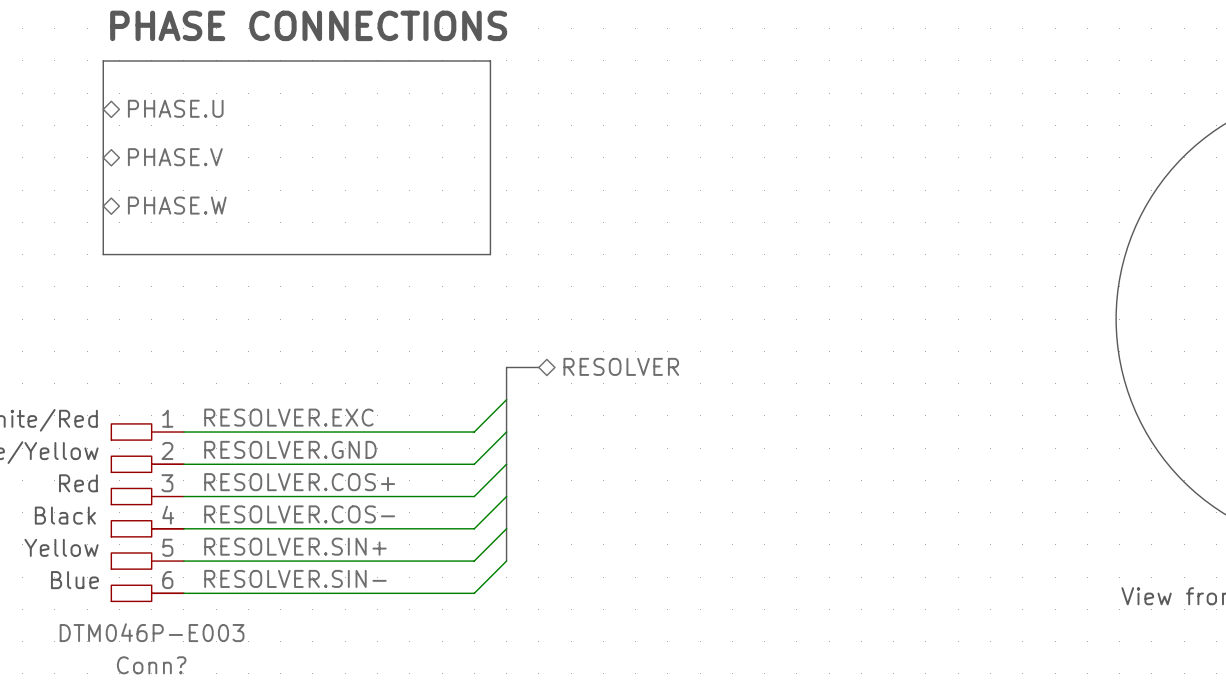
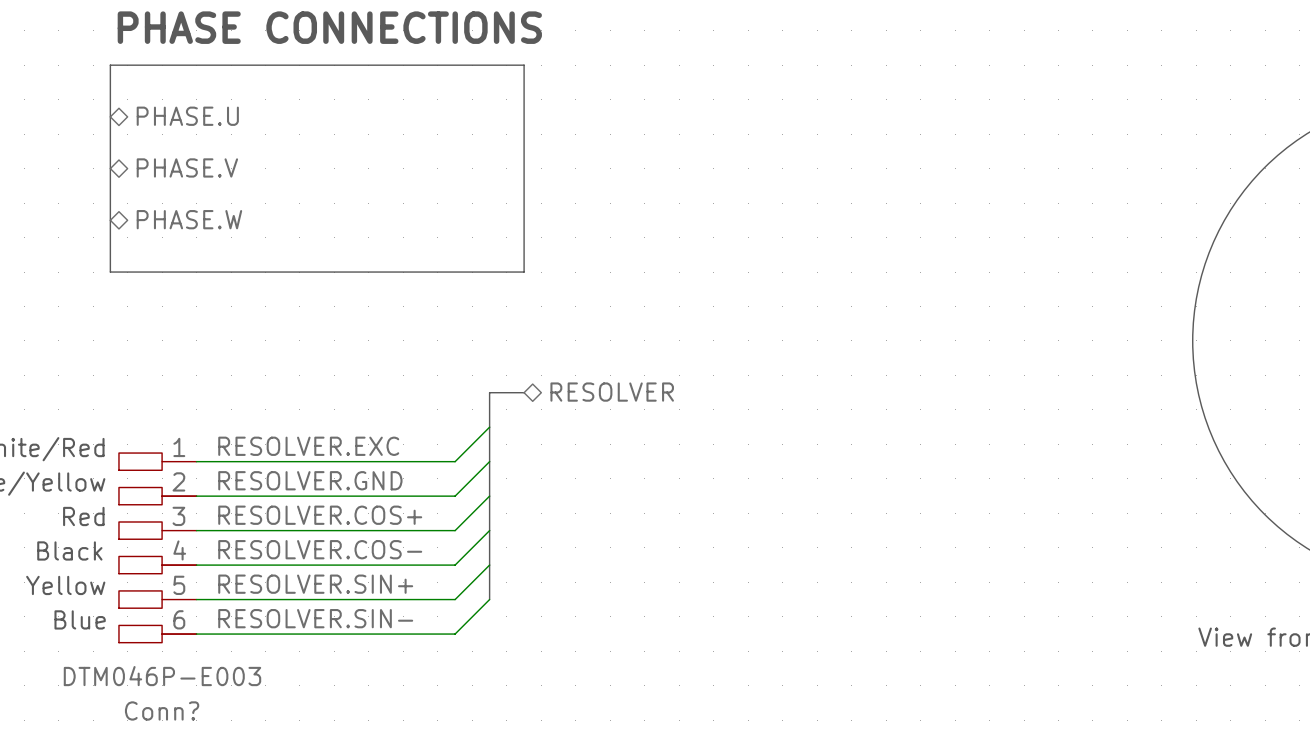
hierarchical label position: RESOLVER (621, 366) -> RESOLVER (612, 392)
bus: (538, 367) (506, 367) (506, 561) -> (524, 392) (489, 392) (489, 599)
wire: (506, 399) (474, 432) (425, 432) -> (489, 427) (455, 461)
wire: (506, 432) (474, 464) (425, 464) -> (489, 461) (455, 496)
wire: (506, 464) (474, 496) (425, 496) -> (489, 496) (455, 530)
wire: (506, 496) (474, 528) (425, 528) -> (489, 530) (455, 565)
wire: (506, 528) (474, 561) (425, 561) -> (489, 565) (455, 599)
wire: (506, 561) (474, 593) (425, 593) -> (489, 599) (455, 634)

